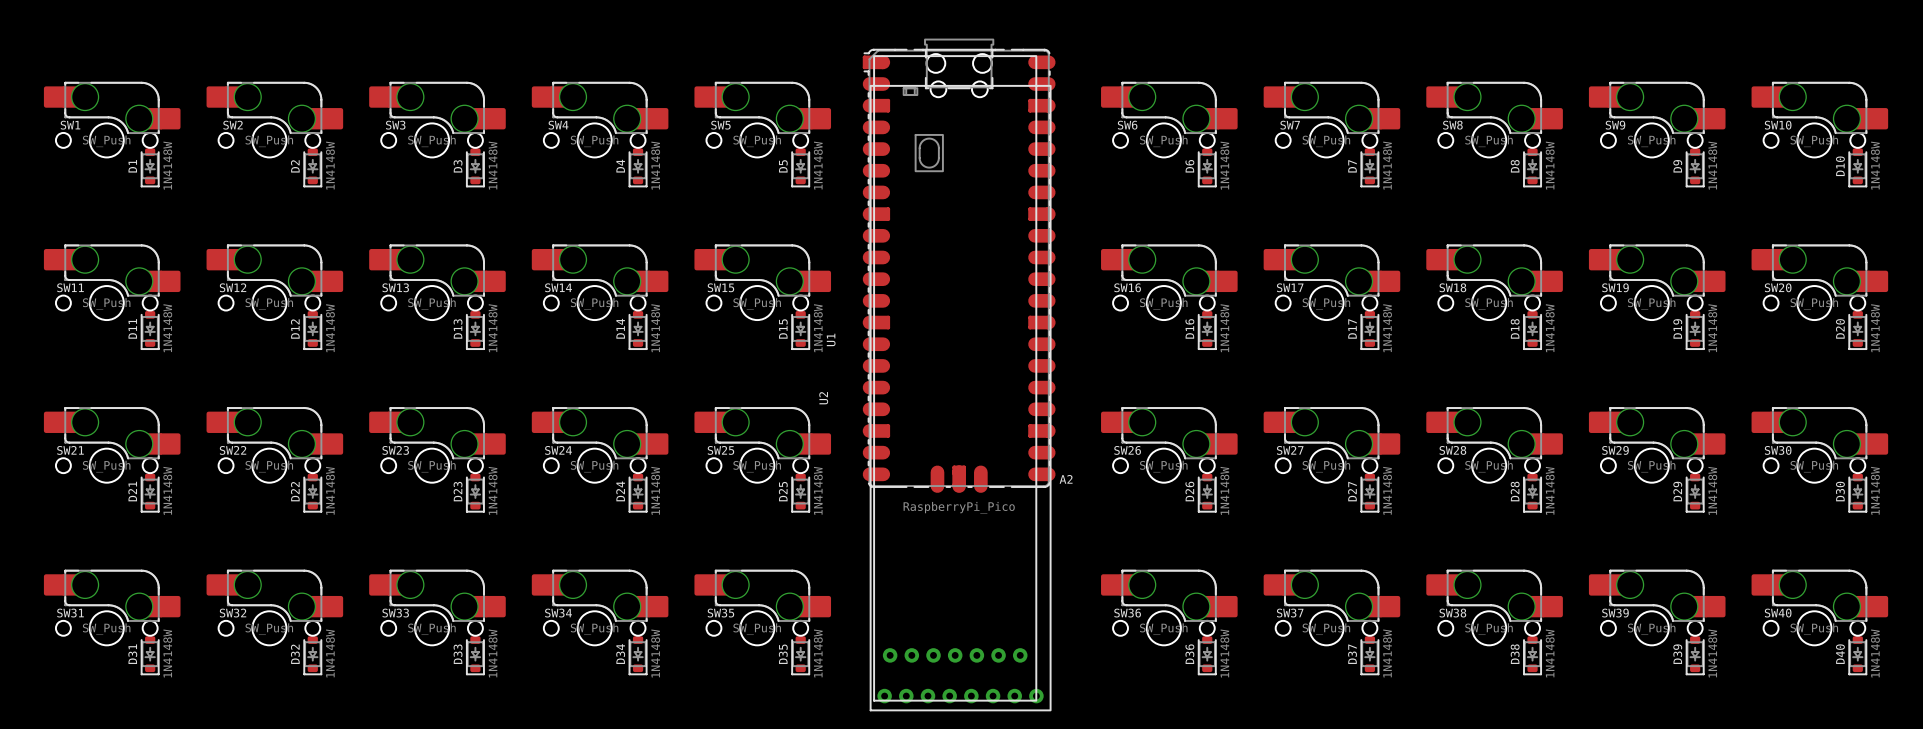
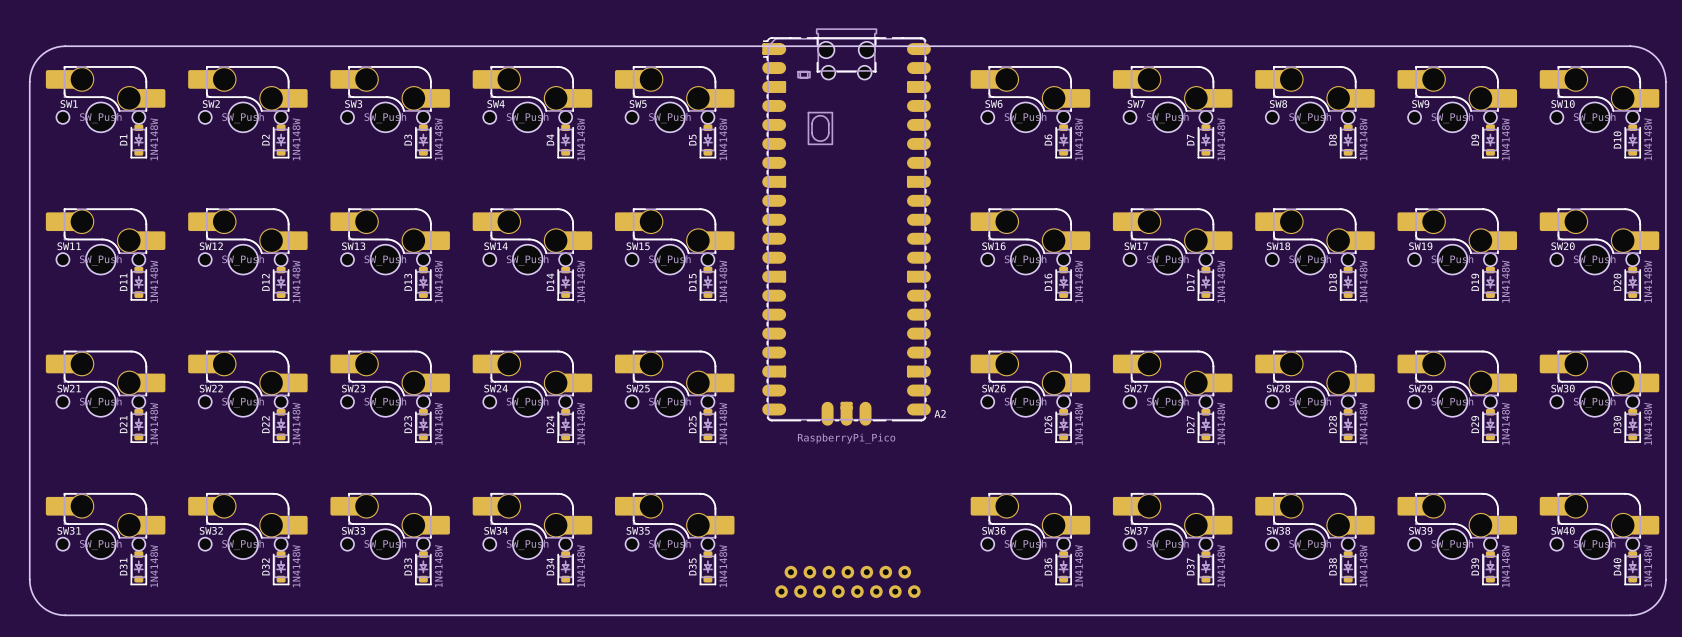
board edge: none -> (65, 46) (1630, 46) (1642, 48) (1652, 53) (1660, 62) (1665, 81) (1665, 579) (1663, 591) (1652, 607) (1642, 613) (1630, 615) (65, 615) (53, 613) (37, 601) (31, 591) (29, 579) (29, 81) (33, 66) (40, 56) (53, 48) (65, 46)
U1: (955, 378) -> none
U2: (960, 398) -> none
part: none -> (847, 572)
part: none -> (847, 591)

